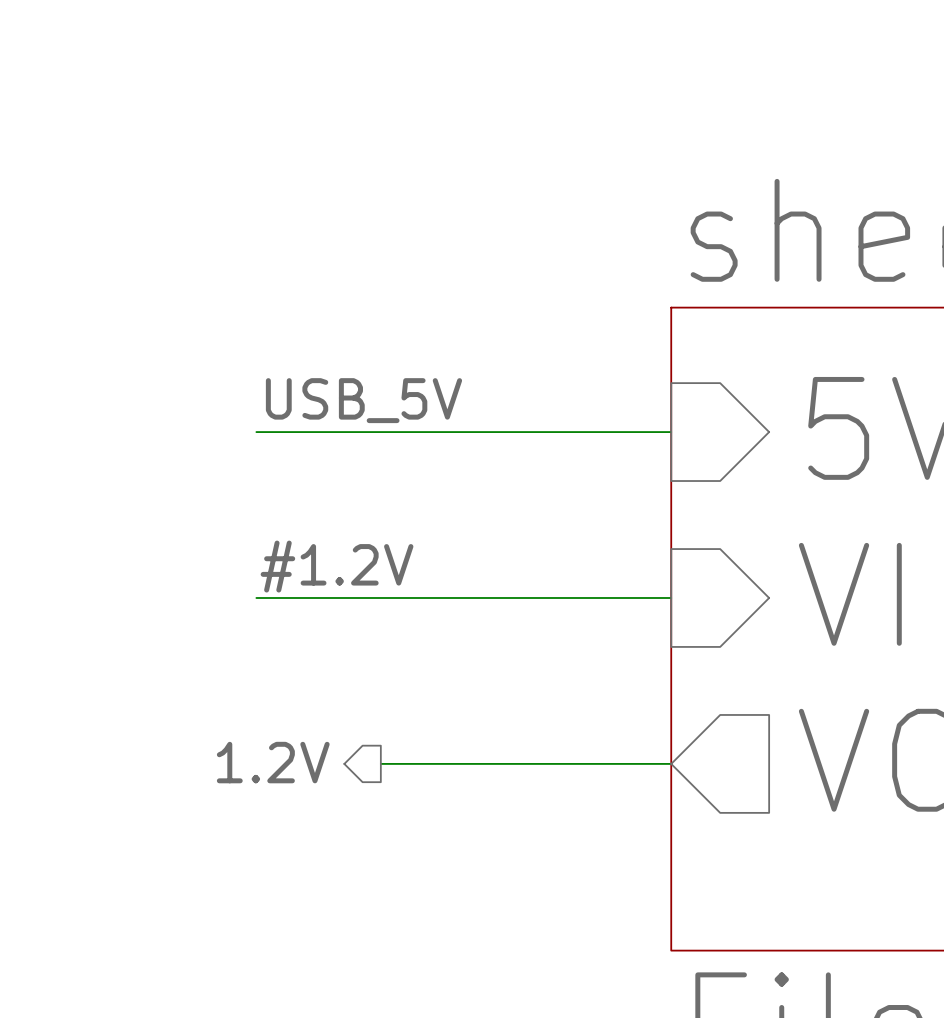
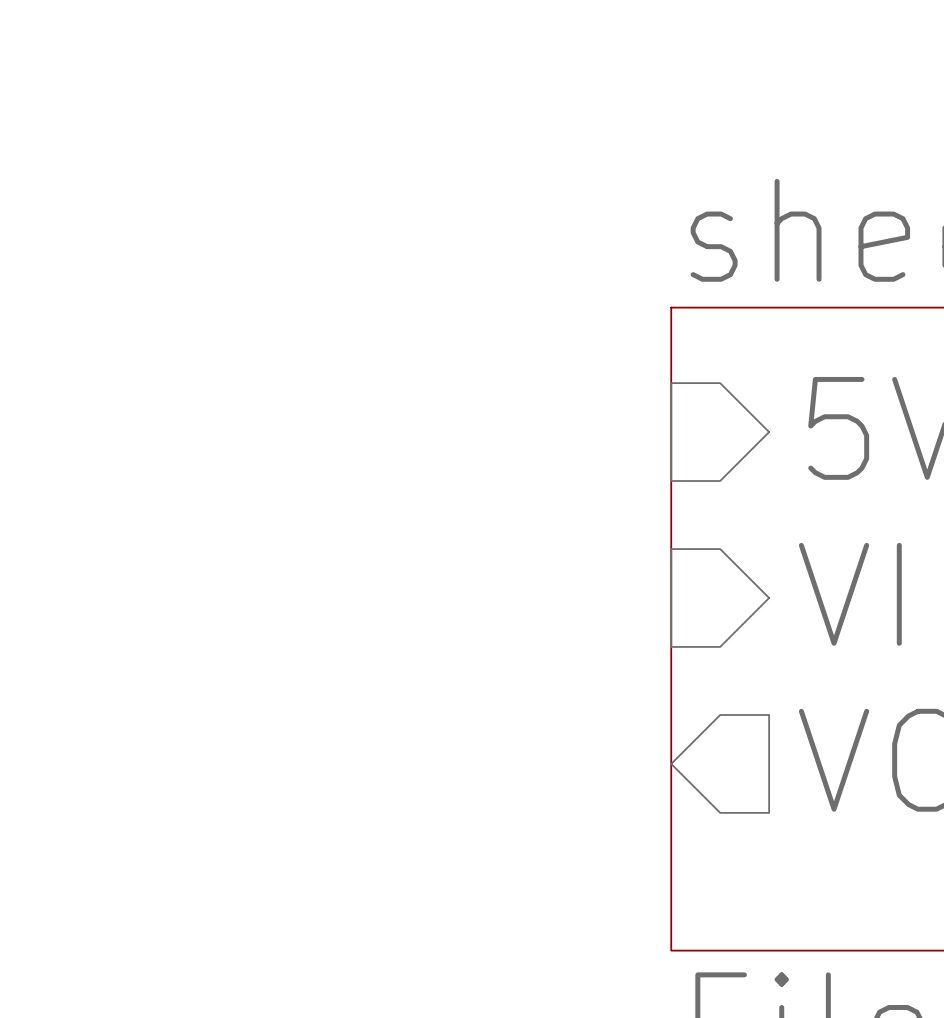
label: USB_5V (363, 400) -> none
wire: (256, 432) (671, 432) -> none
label: #1.2V (337, 566) -> none
wire: (256, 597) (671, 597) -> none
hierarchical label: 1.2V (273, 762) -> none
wire: (380, 763) (671, 763) -> none

